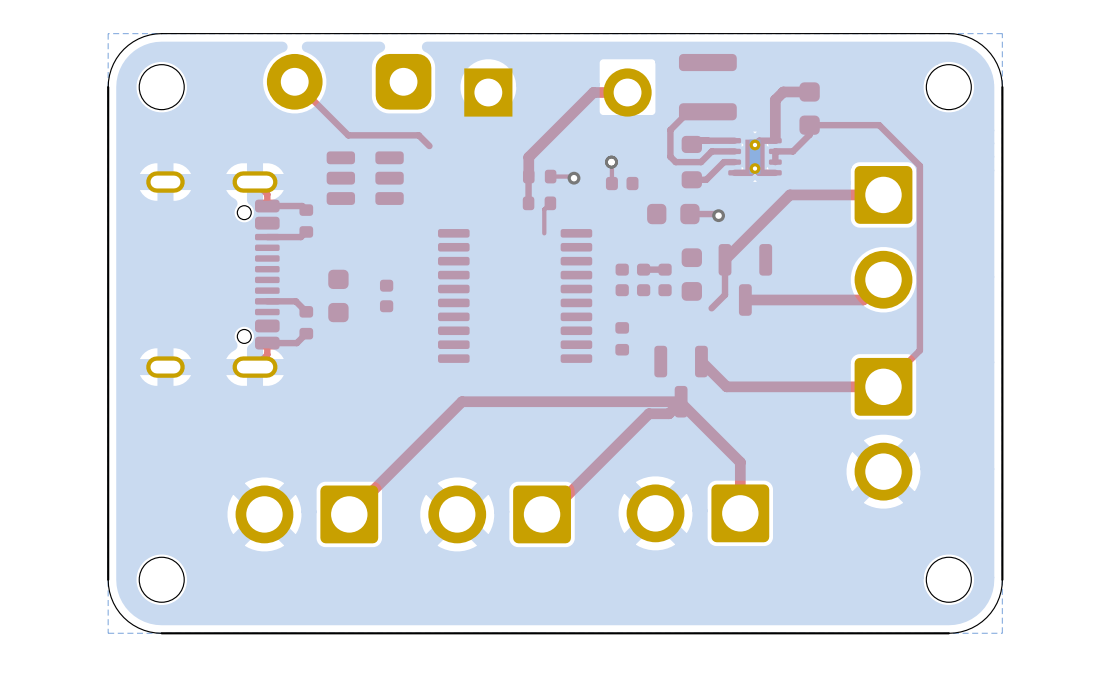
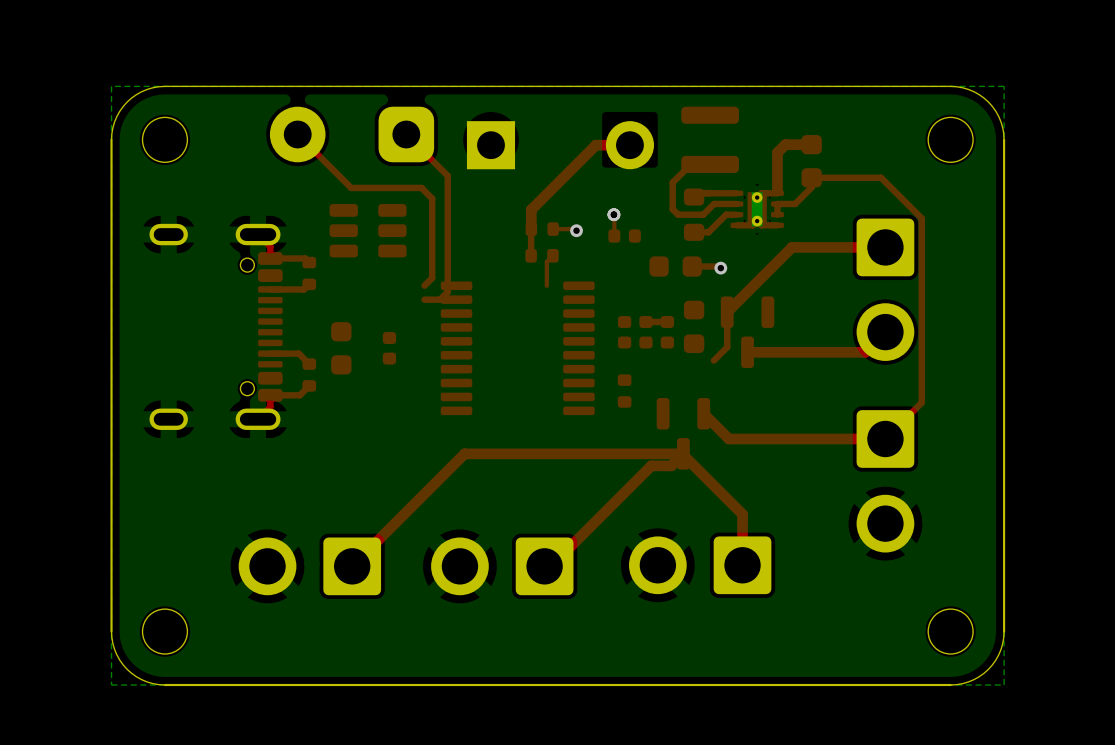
top track: none -> (406, 134) (447, 175) (447, 291) (439, 299) (424, 299)
top track: none -> (432, 198) (432, 278) (424, 285)

